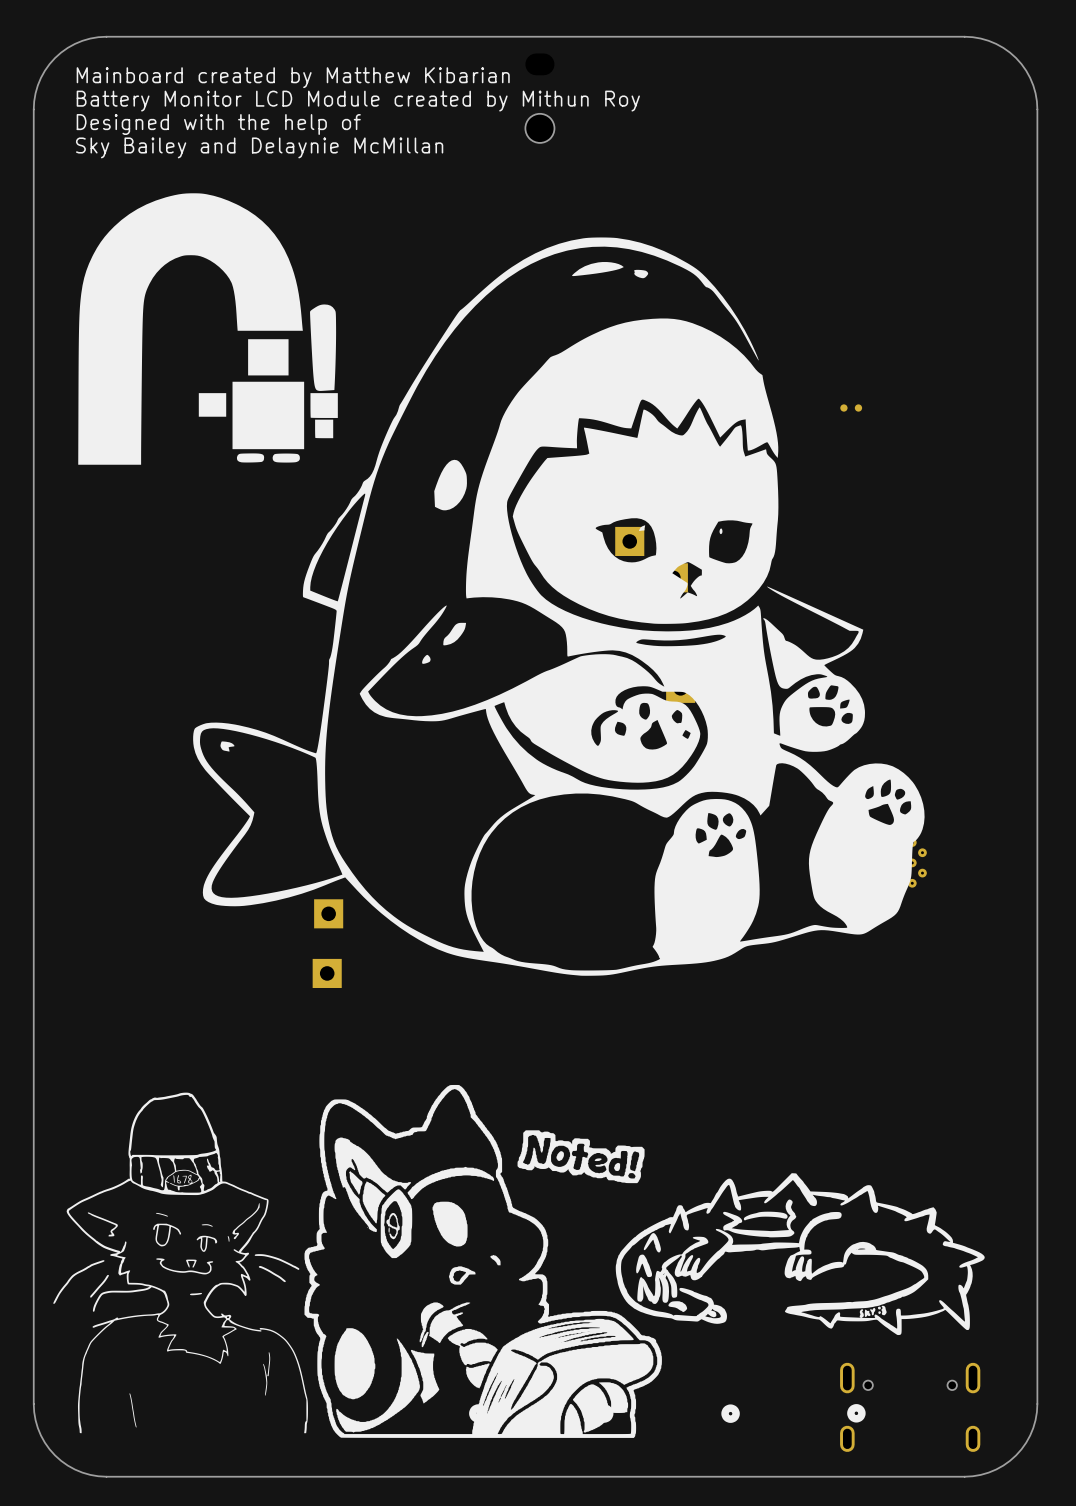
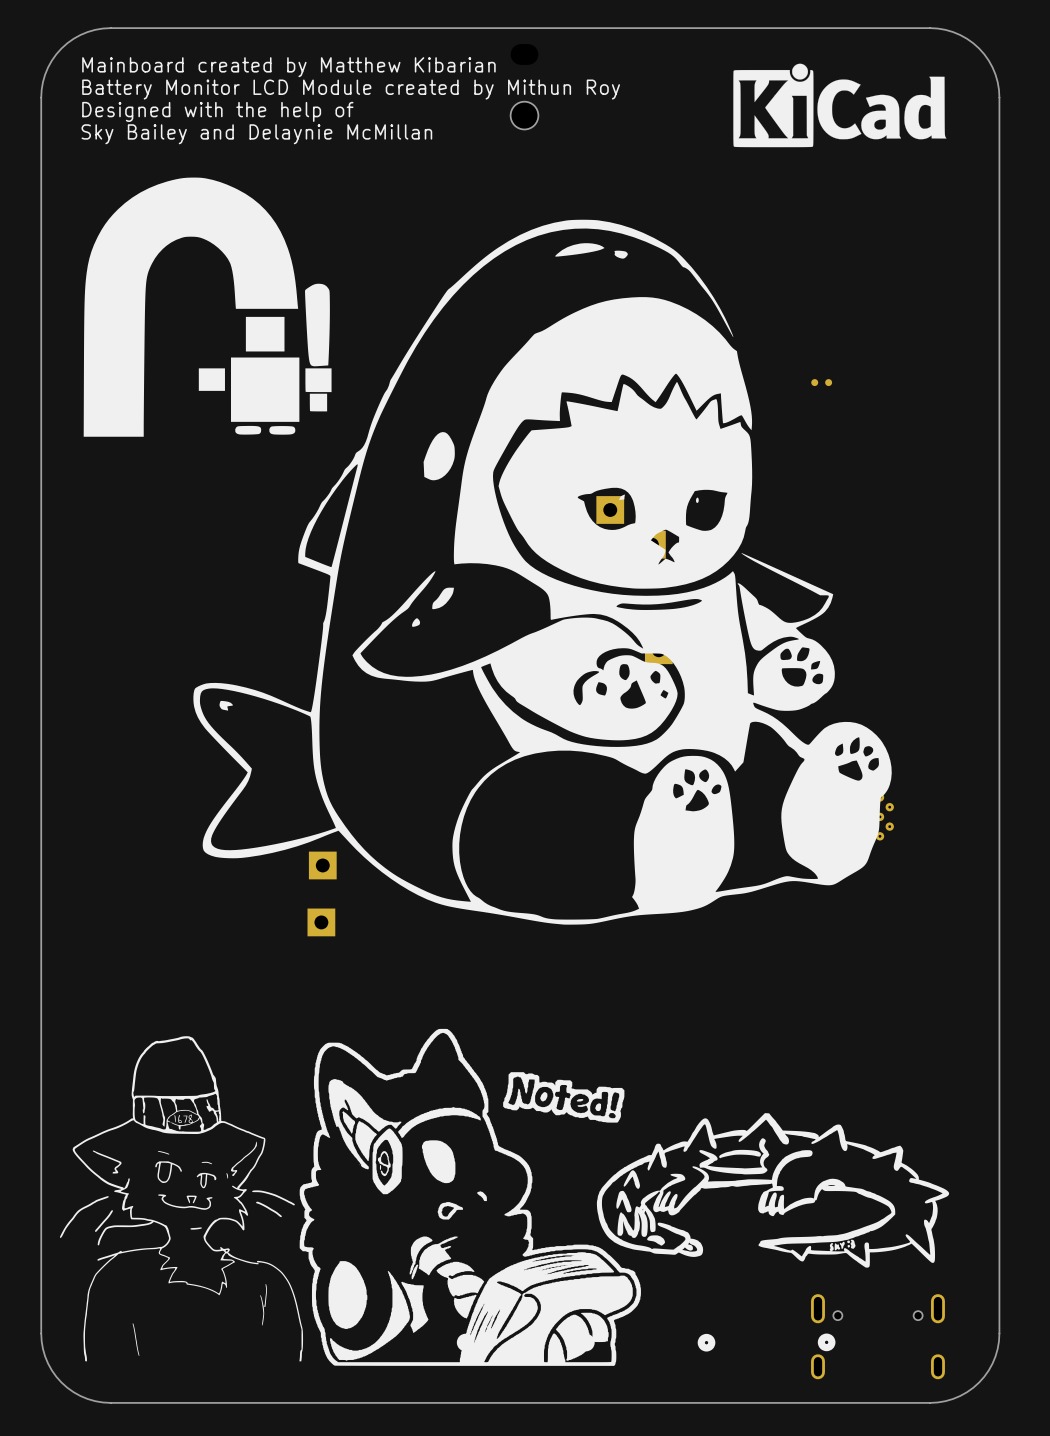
drawing: none -> [733, 63, 947, 148]

